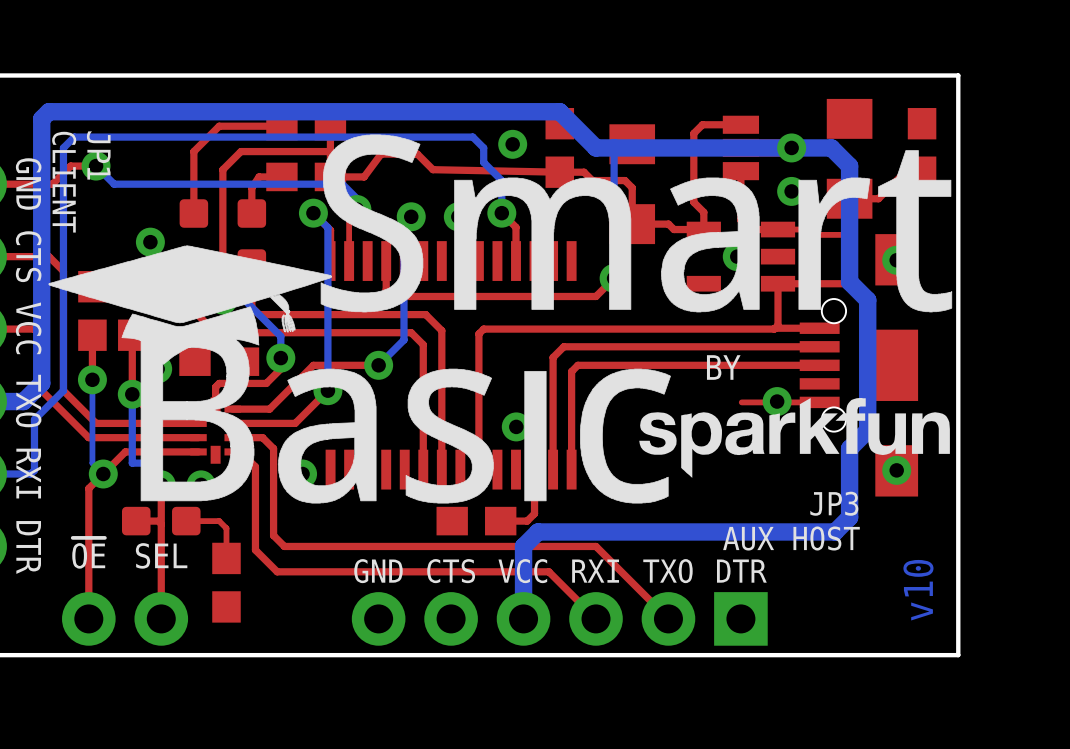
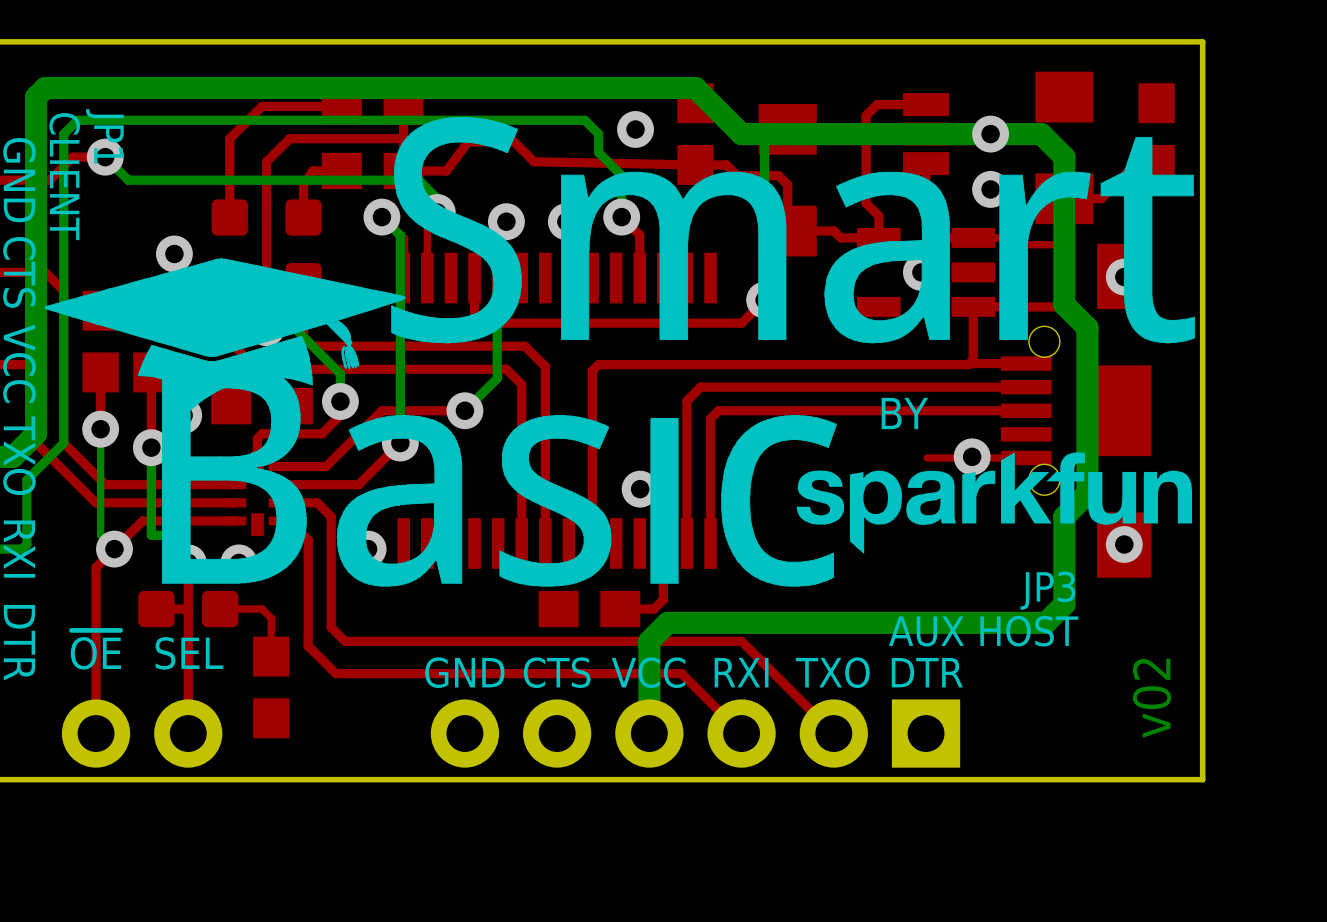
text: v10 (918, 590) -> v02 (1152, 698)

